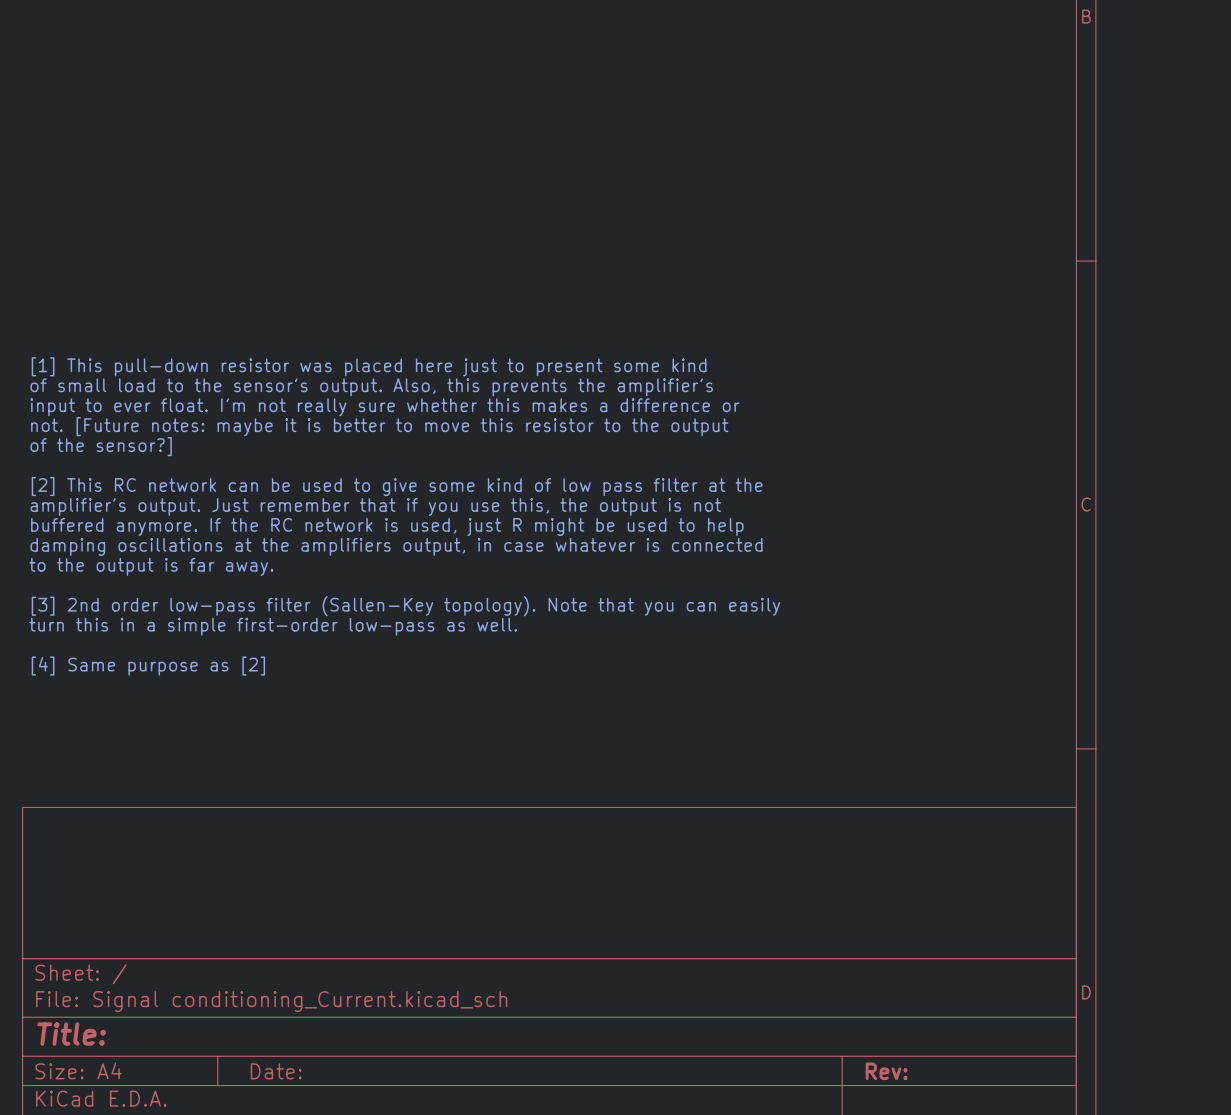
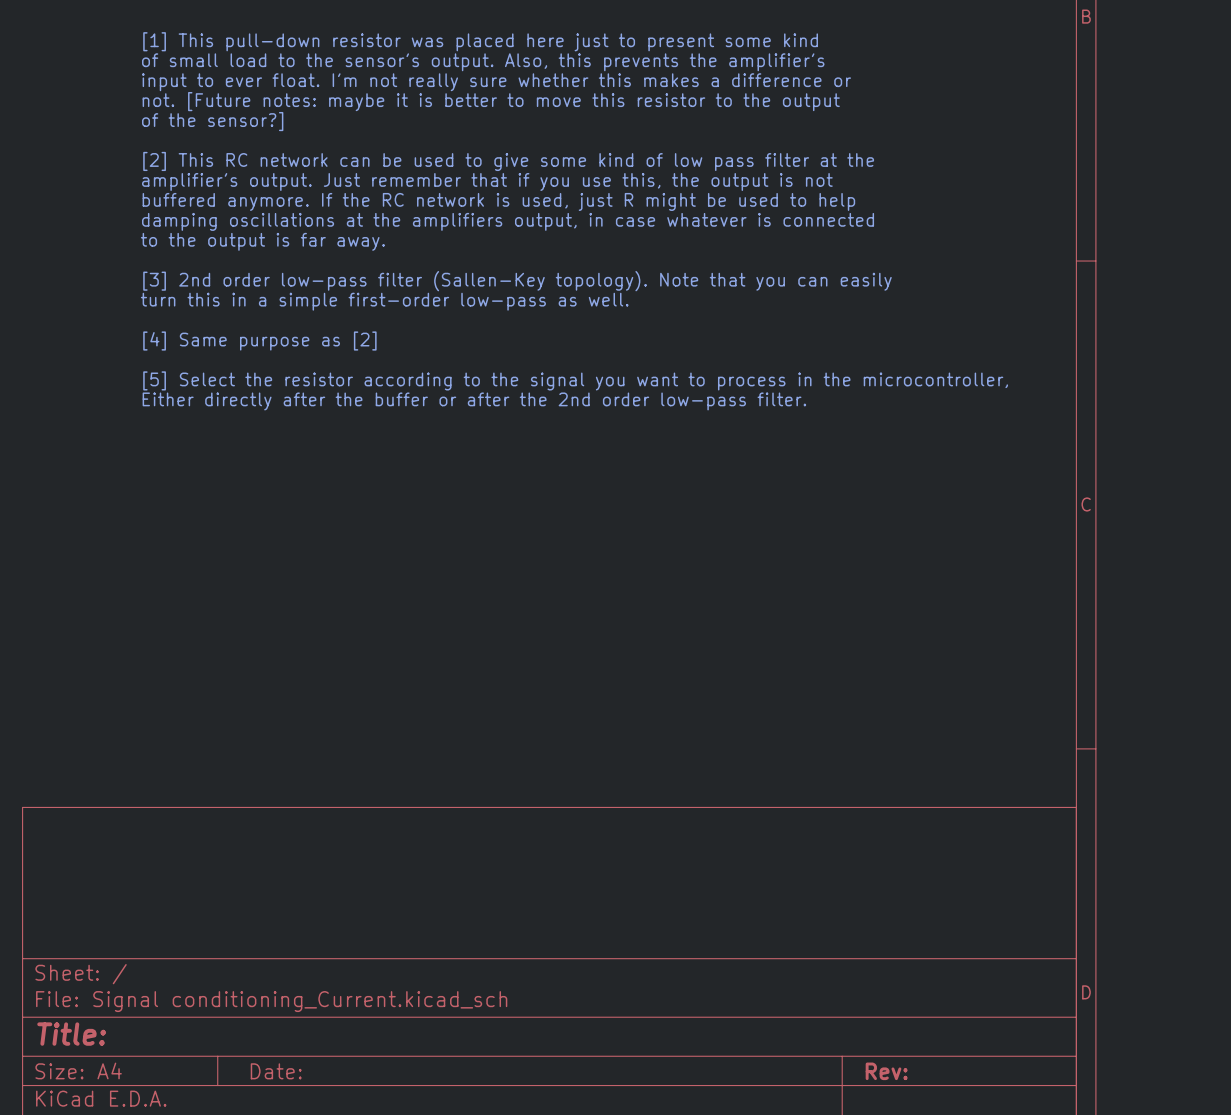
text: none -> [1] This pull-down resistor was placed here just to present some kind (480, 41)
text: none -> of small load to the sensor's output. Also, this prevents the amplifier's (483, 62)
text: none -> input to ever float. I'm not really sure whether this makes a difference or (496, 82)
text: none -> not. [Future notes: maybe it is better to move this resistor to the output (491, 101)
text: none -> of the sensor?] (212, 121)
text: none -> [2] This RC network can be used to give some kind of low pass filter at the (508, 161)
text: none -> amplifier's output. Just remember that if you use this, the output is not (487, 181)
text: none -> buffered anymore. If the RC network is used, just R might be used to help (498, 201)
text: none -> damping oscillations at the amplifiers output, in case whatever is connected (508, 221)
text: none -> to the output is far away. (262, 241)
text: none -> [3] 2nd order low-pass filter (Sallen-Key topology). Note that you can easily (517, 281)
text: none -> turn this in a simple first-order low-pass as well. (384, 301)
text: none -> [4] Same purpose as [2] (259, 341)
text: [1] This pull-down resistor was placed here just to present some kind (369, 366) -> none
text: none -> [5] Select the resistor according to the signal you want to process in the microcontroller, (575, 380)
text: of small load to the sensor's output. Also, this prevents the amplifier's (371, 387) -> none
text: none -> Either directly after the buffer or after the 2nd order low-pass filter. (474, 401)
text: input to ever float. I'm not really sure whether this makes a difference or (385, 407) -> none
text: not. [Future notes: maybe it is better to move this resistor to the output (379, 426) -> none
text: of the sensor?] (101, 446) -> none
text: [2] This RC network can be used to give some kind of low pass filter at the (397, 486) -> none
text: amplifier's output. Just remember that if you use this, the output is not (375, 507) -> none
text: buffered anymore. If the RC network is used, just R might be used to help (387, 526) -> none
text: damping oscillations at the amplifiers output, in case whatever is connected (396, 546) -> none
text: to the output is far away. (151, 566) -> none
text: [3] 2nd order low-pass filter (Sallen-Key topology). Note that you can easily (405, 606) -> none
text: turn this in a simple first-order low-pass as well. (273, 626) -> none
text: [4] Same purpose as [2] (148, 666) -> none

